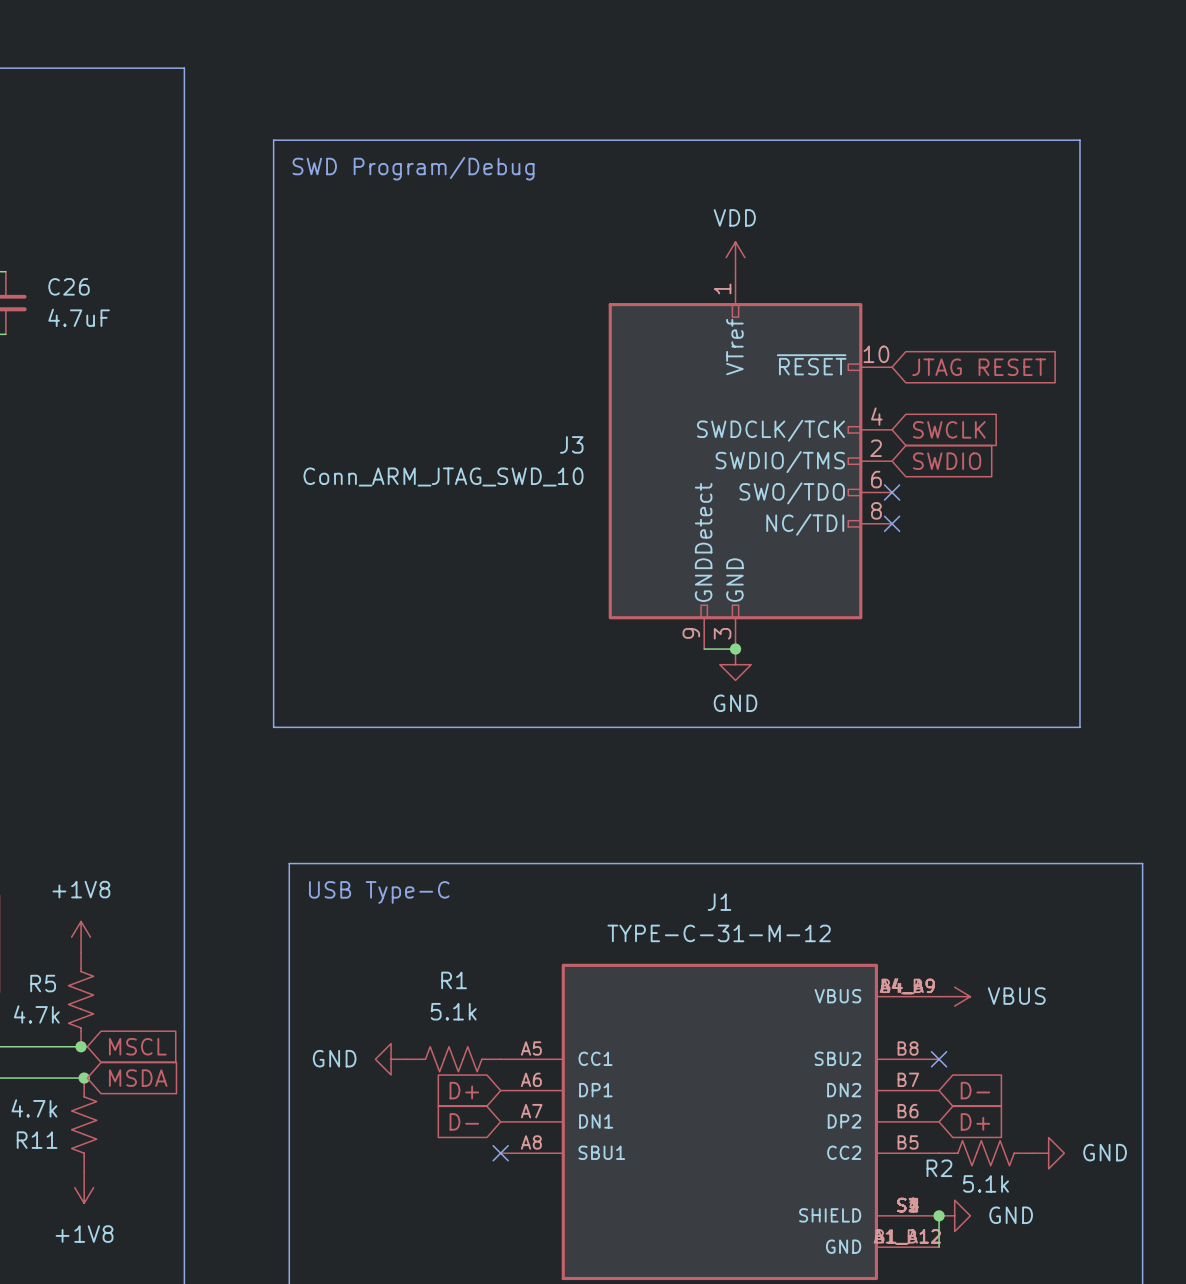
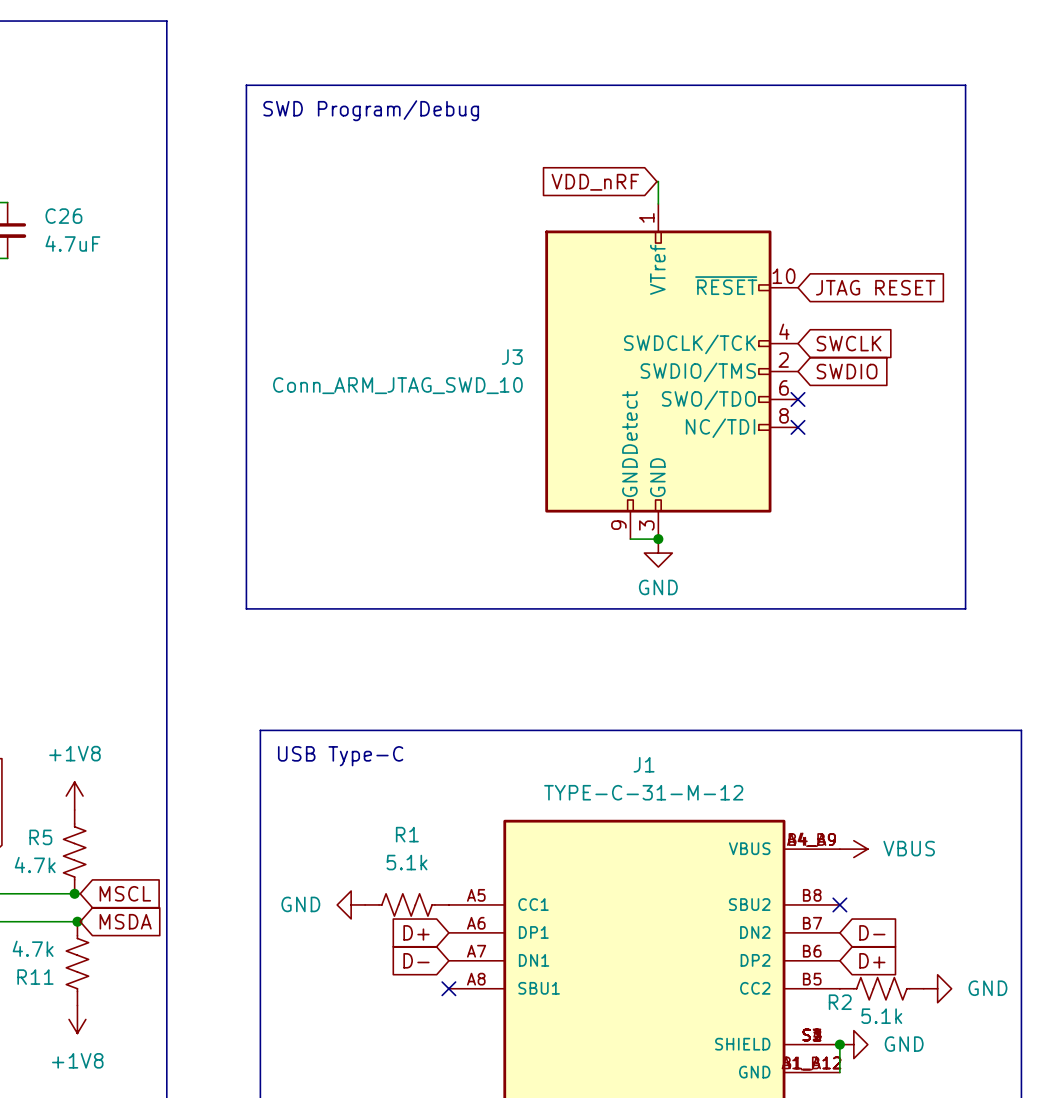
global label: none -> VDD_nRF (595, 182)
power symbol: VDD (735, 257) -> none

